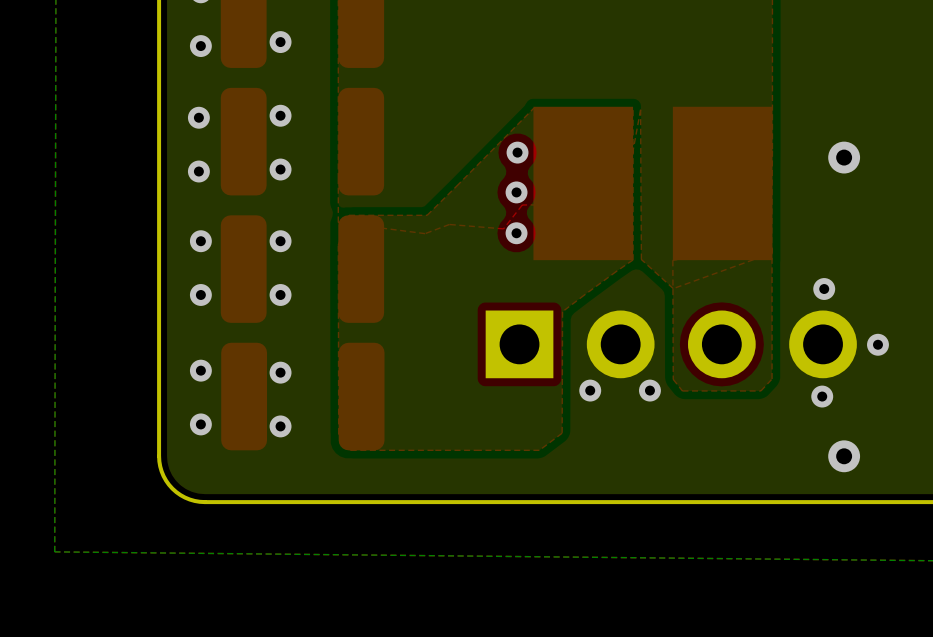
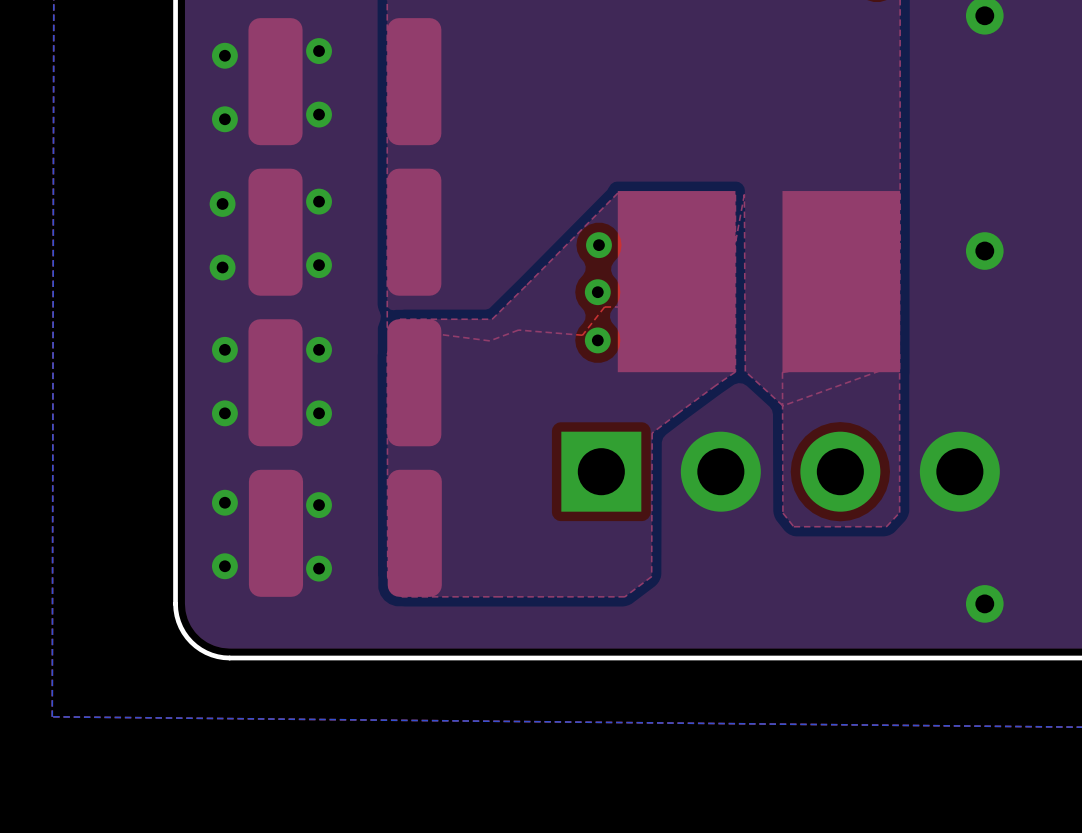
via: (824, 289) -> none
via: (877, 344) -> none
via: (590, 390) -> none
via: (649, 390) -> none
via: (822, 396) -> none

